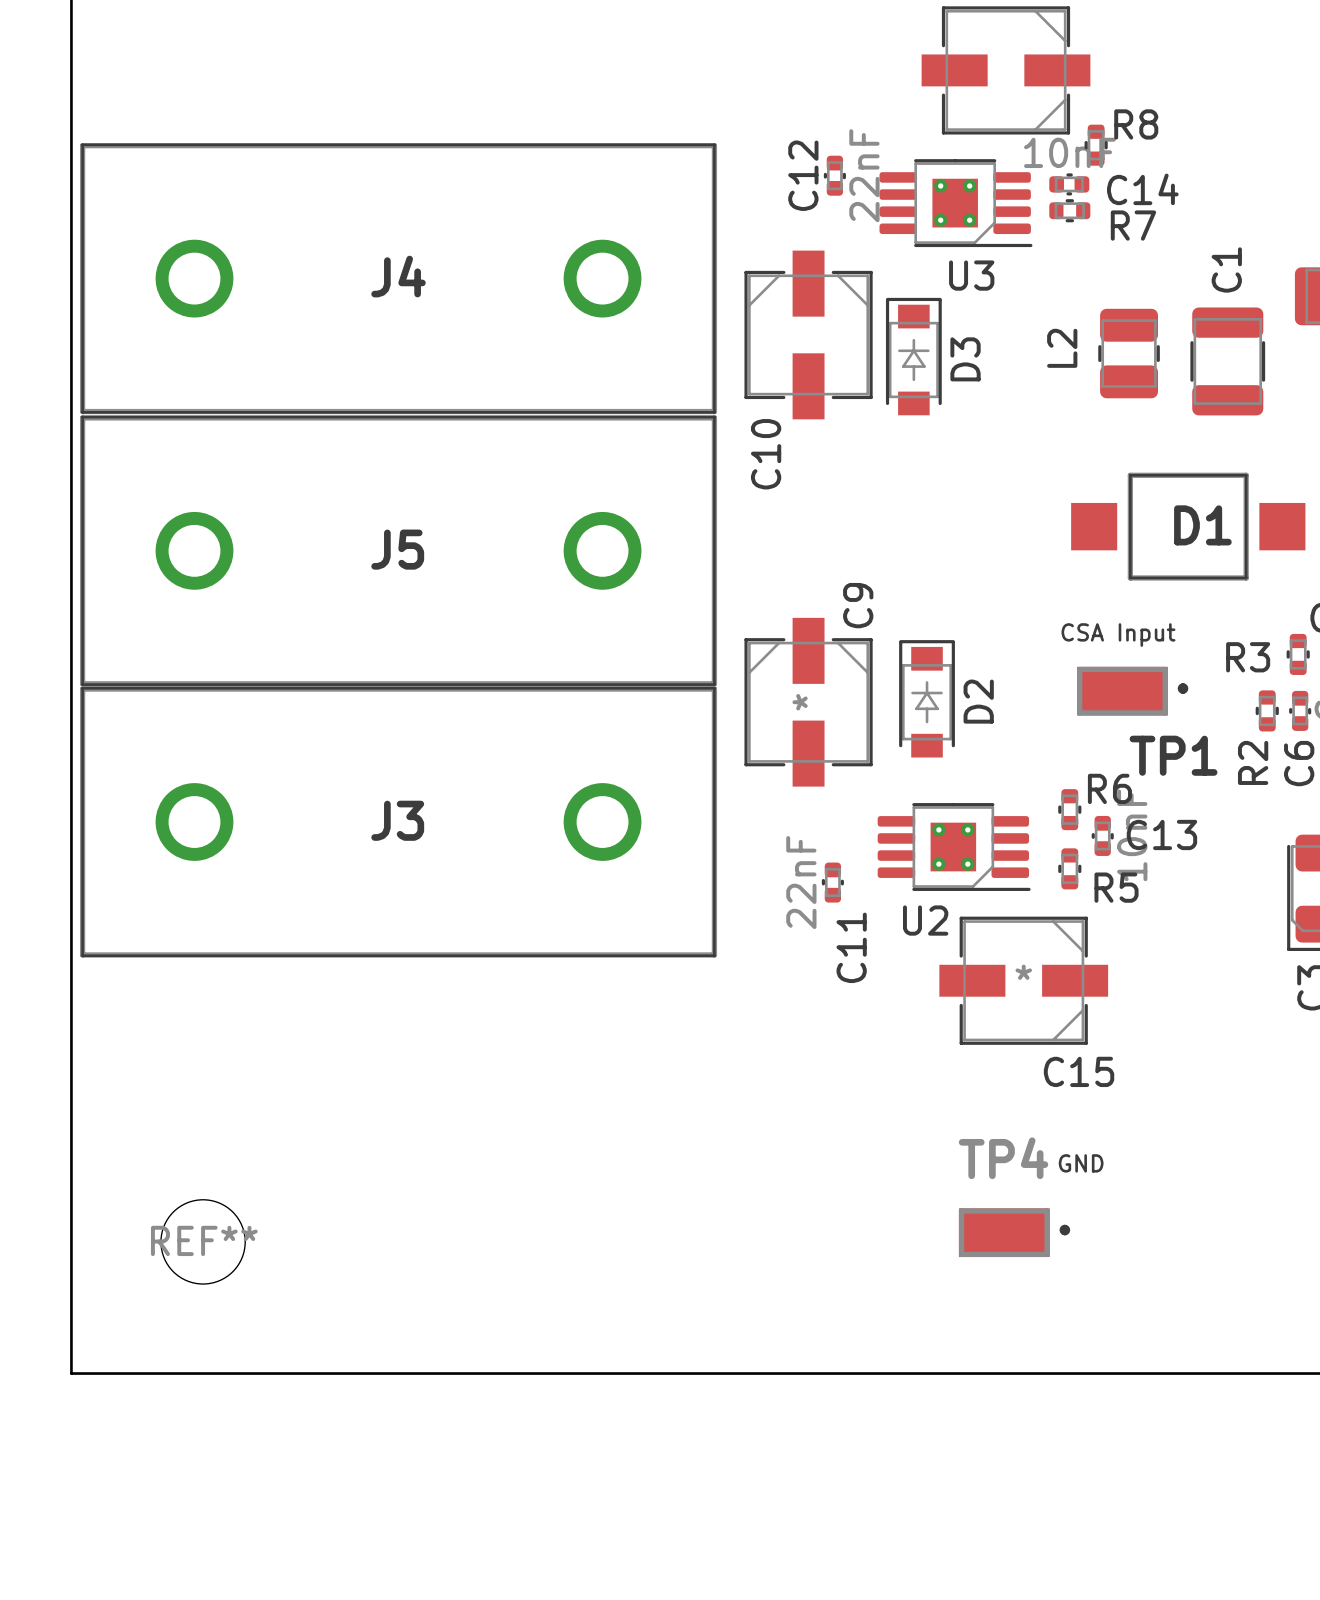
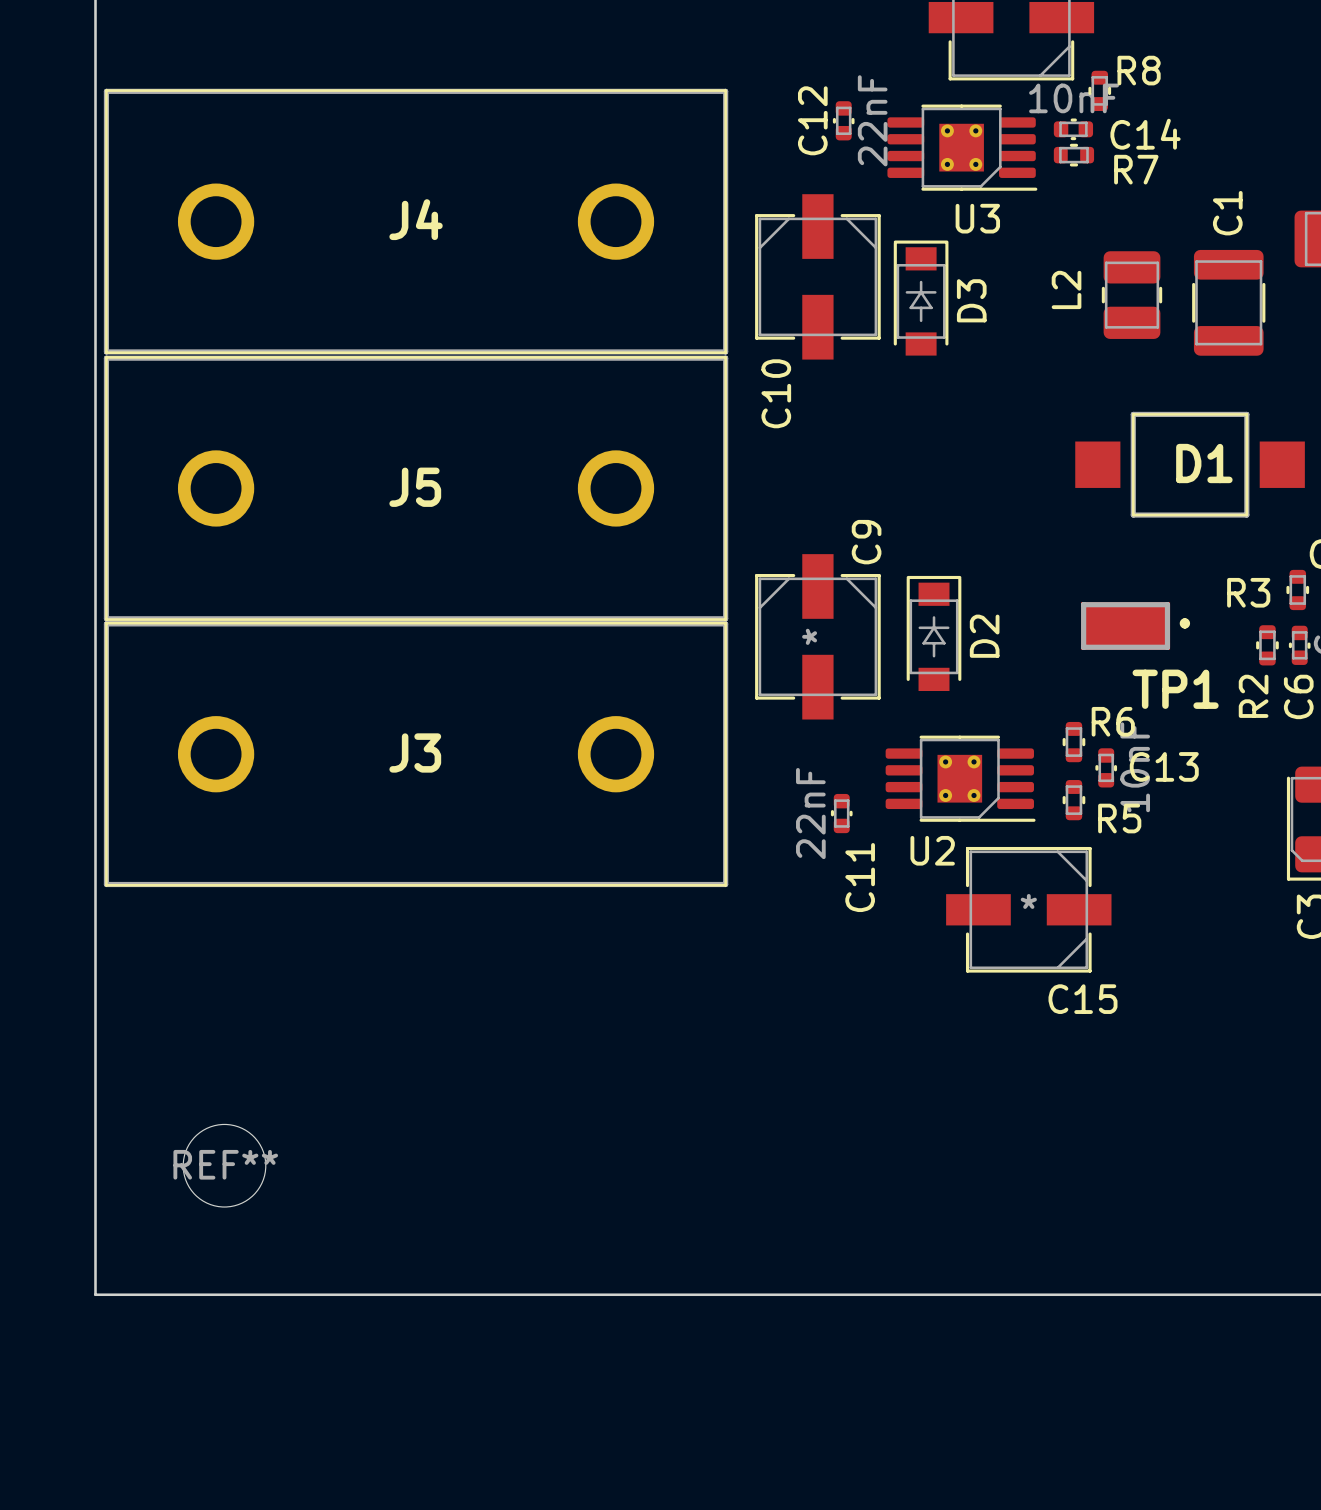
text: CSA Input (1118, 635) -> none
text: GND (1081, 1163) -> none
TP4: (1014, 1232) -> none

